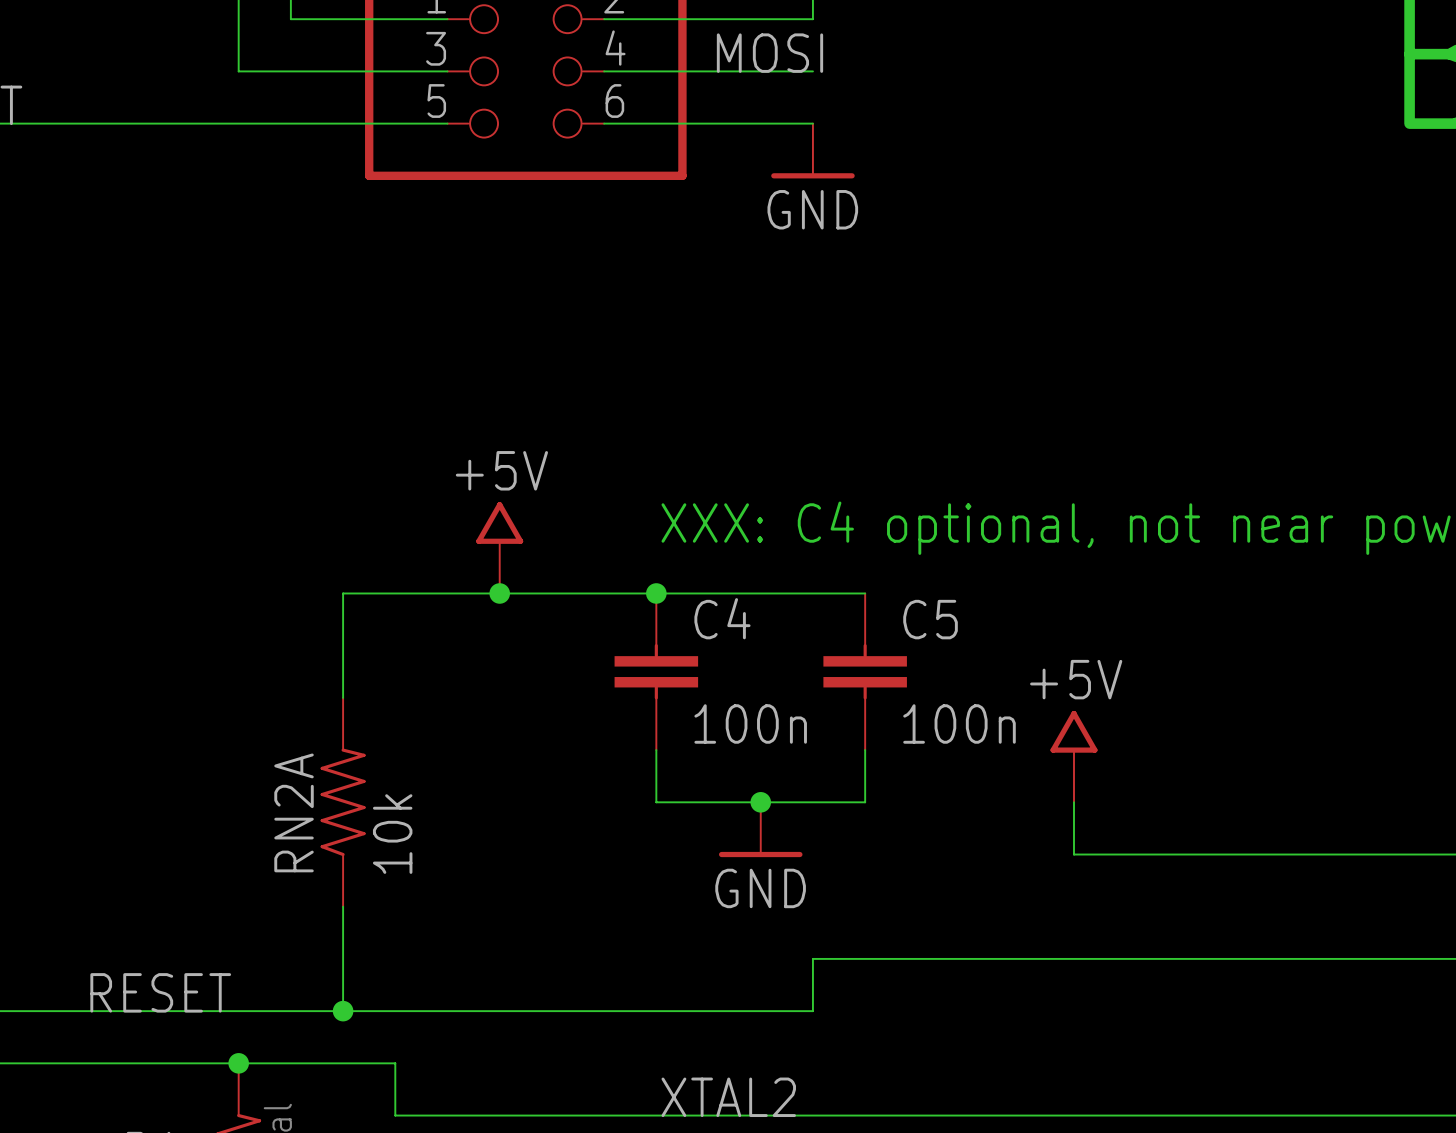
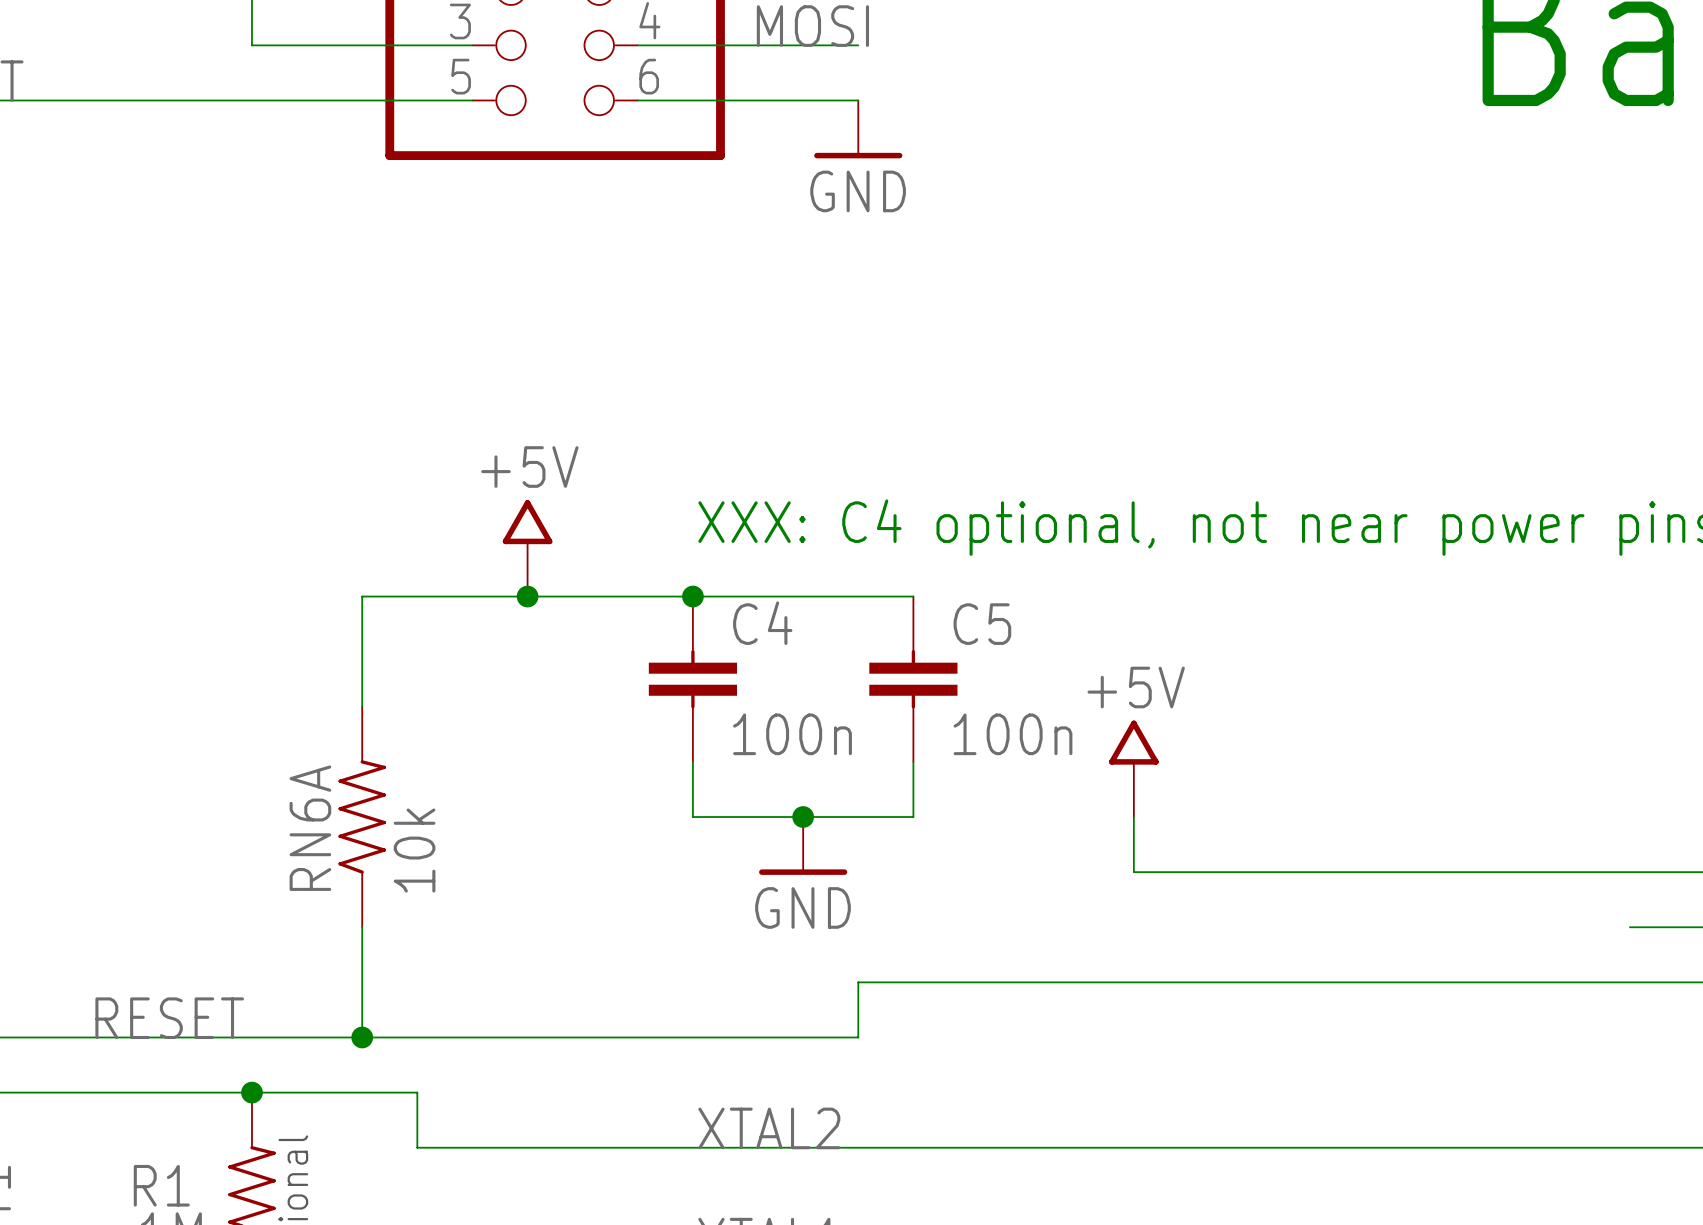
RN2A name: RN2A (294, 812) -> RN6A (310, 828)

